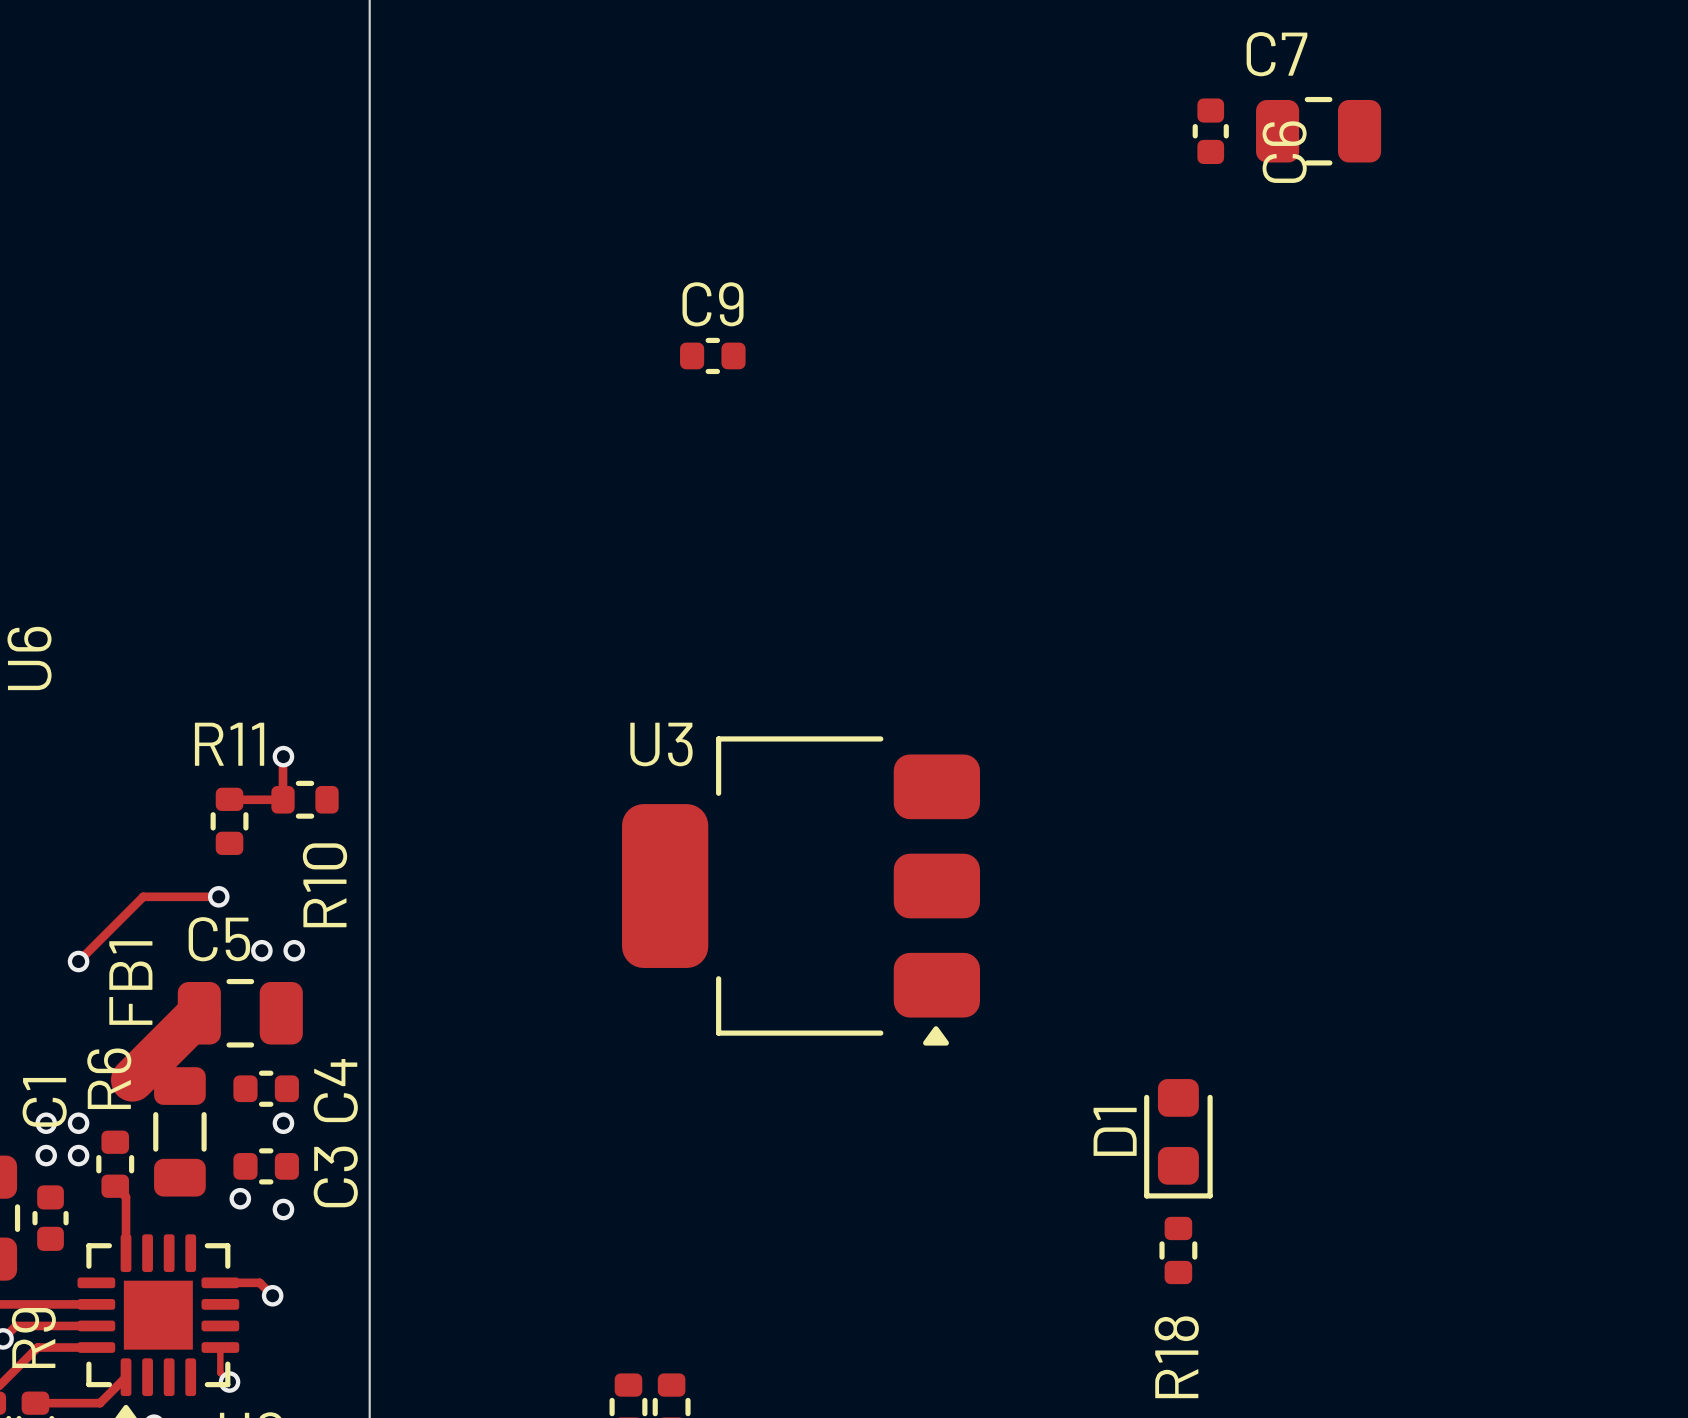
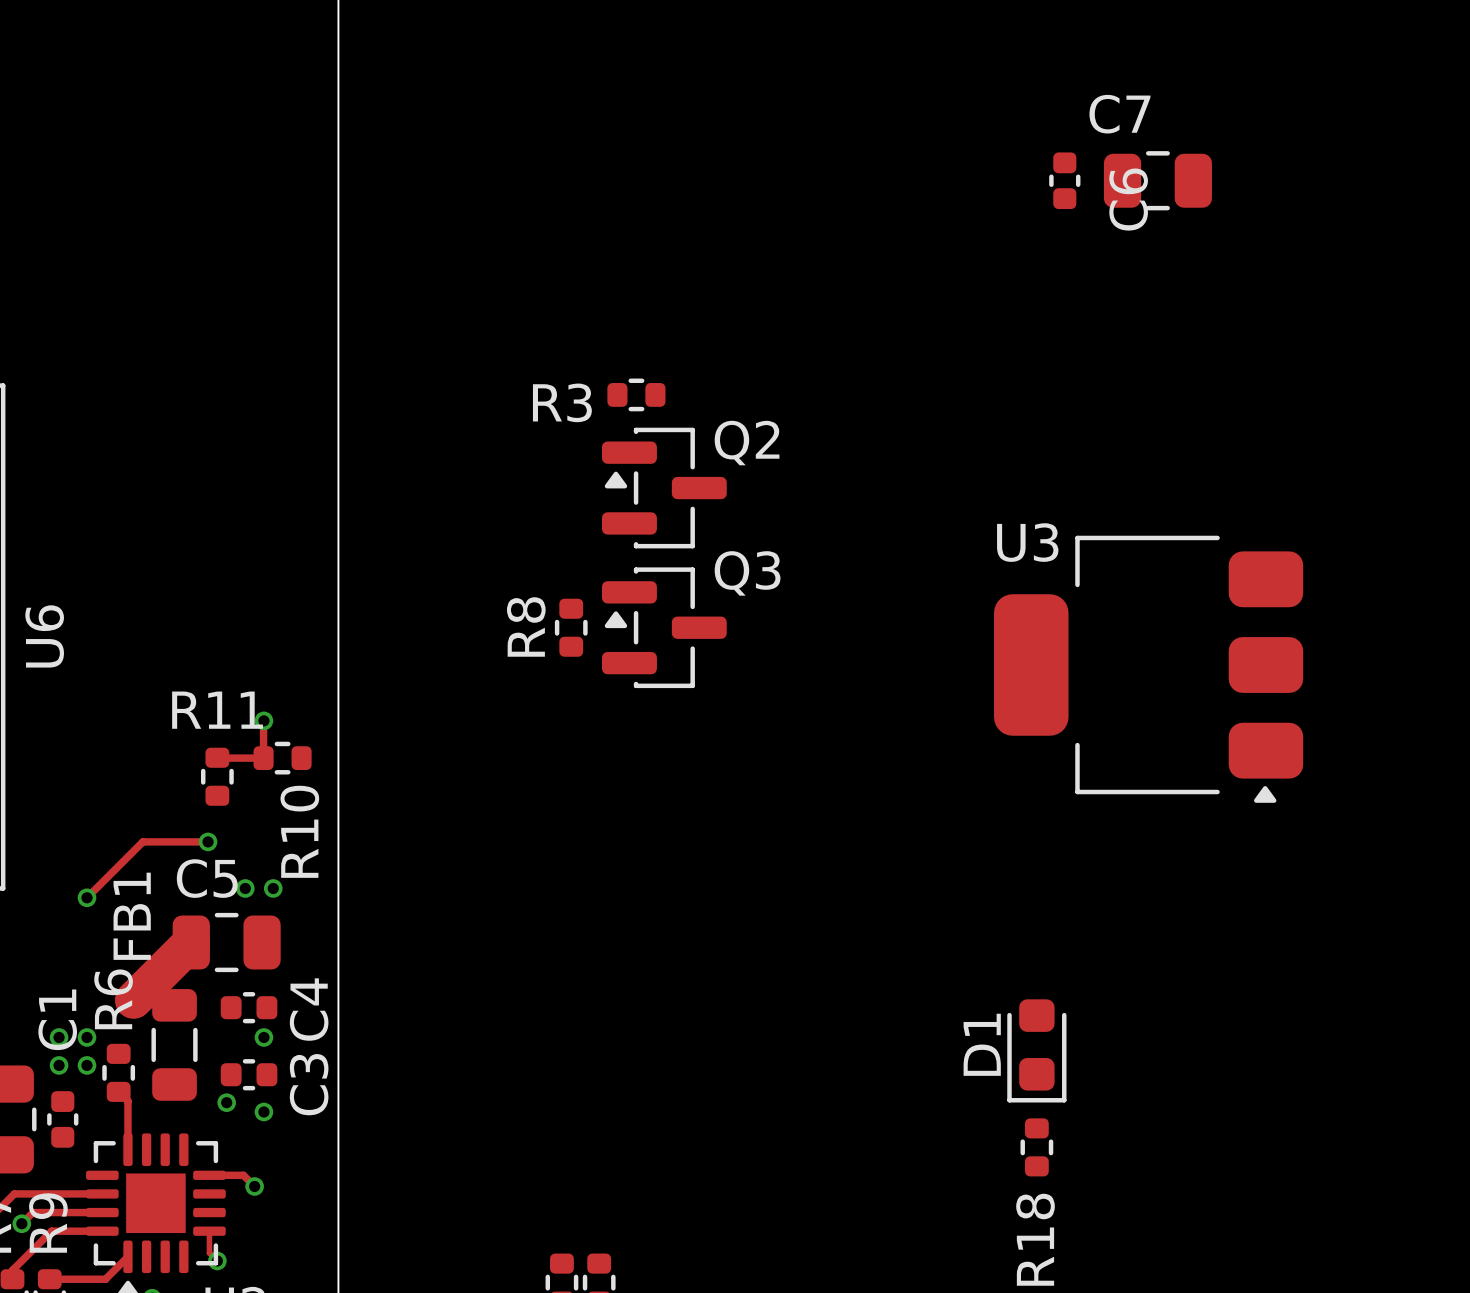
C9: (712, 355) -> none
R3: none -> (636, 394)
Q2: none -> (664, 488)
R8: none -> (571, 627)
Q3: none -> (664, 627)
U3 position: (801, 890) -> (1148, 669)

